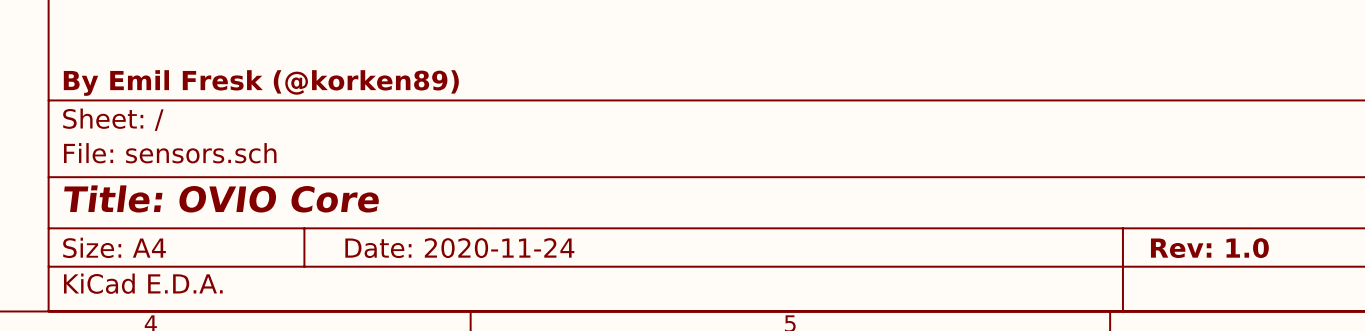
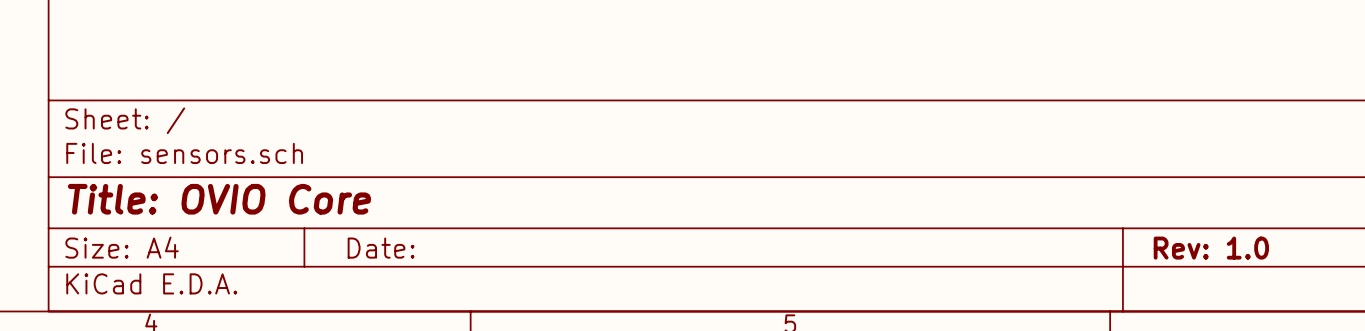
title block: By Emil Fresk (@korken89) (261, 82) -> none
title block: Date: 2020-11-24 (459, 248) -> Date: (381, 248)

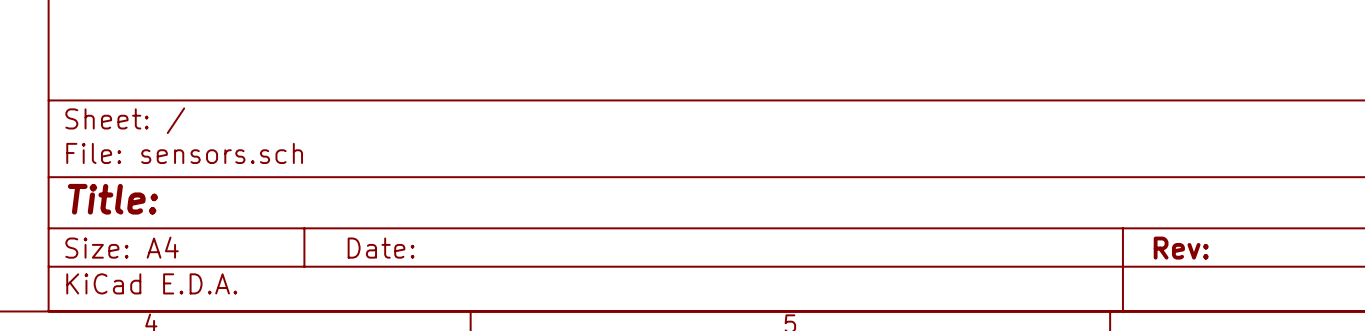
title block: Title: OVIO Core (219, 199) -> Title: (112, 199)
title block: Rev: 1.0 (1211, 248) -> Rev: (1181, 248)

